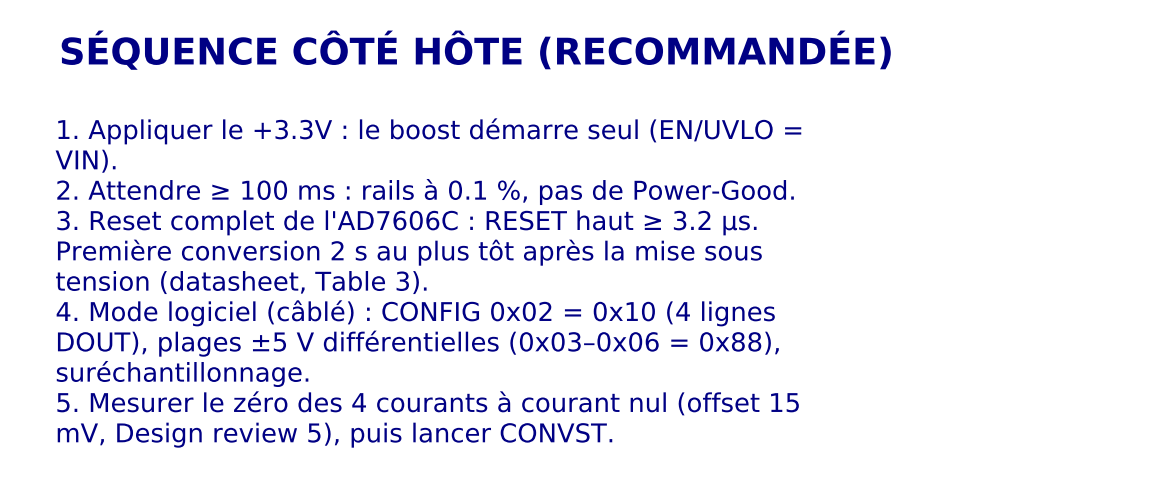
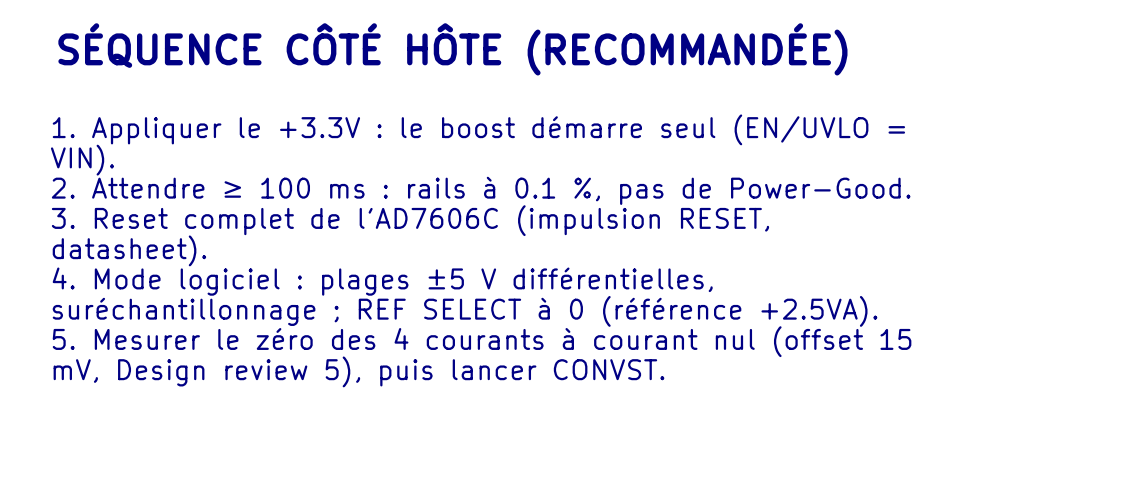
text: 3. Reset complet de l'AD7606C : RESET haut ≥ 3.2 µs. (406, 222) -> 3. Reset complet de l'AD7606C (impulsion RESET, (410, 220)
text: Première conversion 2 s au plus tôt après la mise sous (409, 252) -> datasheet). (129, 250)
text: tension (datasheet, Table 3). (241, 282) -> 4. Mode logiciel : plages ±5 V différentielles, (382, 281)
text: 4. Mode logiciel (câblé) : CONFIG 0x02 = 0x10 (4 lignes (415, 313) -> suréchantillonnage ; REF SELECT à 0 (référence +2.5VA). (465, 311)
text: DOUT), plages ±5 V différentielles (0x03–0x06 = 0x88), (418, 343) -> 5. Mesurer le zéro des 4 courants à courant nul (offset 15 (482, 341)
text: suréchantillonnage. (182, 373) -> mV, Design review 5), puis lancer CONVST. (358, 371)
text: 5. Mesurer le zéro des 4 courants à courant nul (offset 15 (428, 403) -> none
text: mV, Design review 5), puis lancer CONVST. (334, 435) -> none

